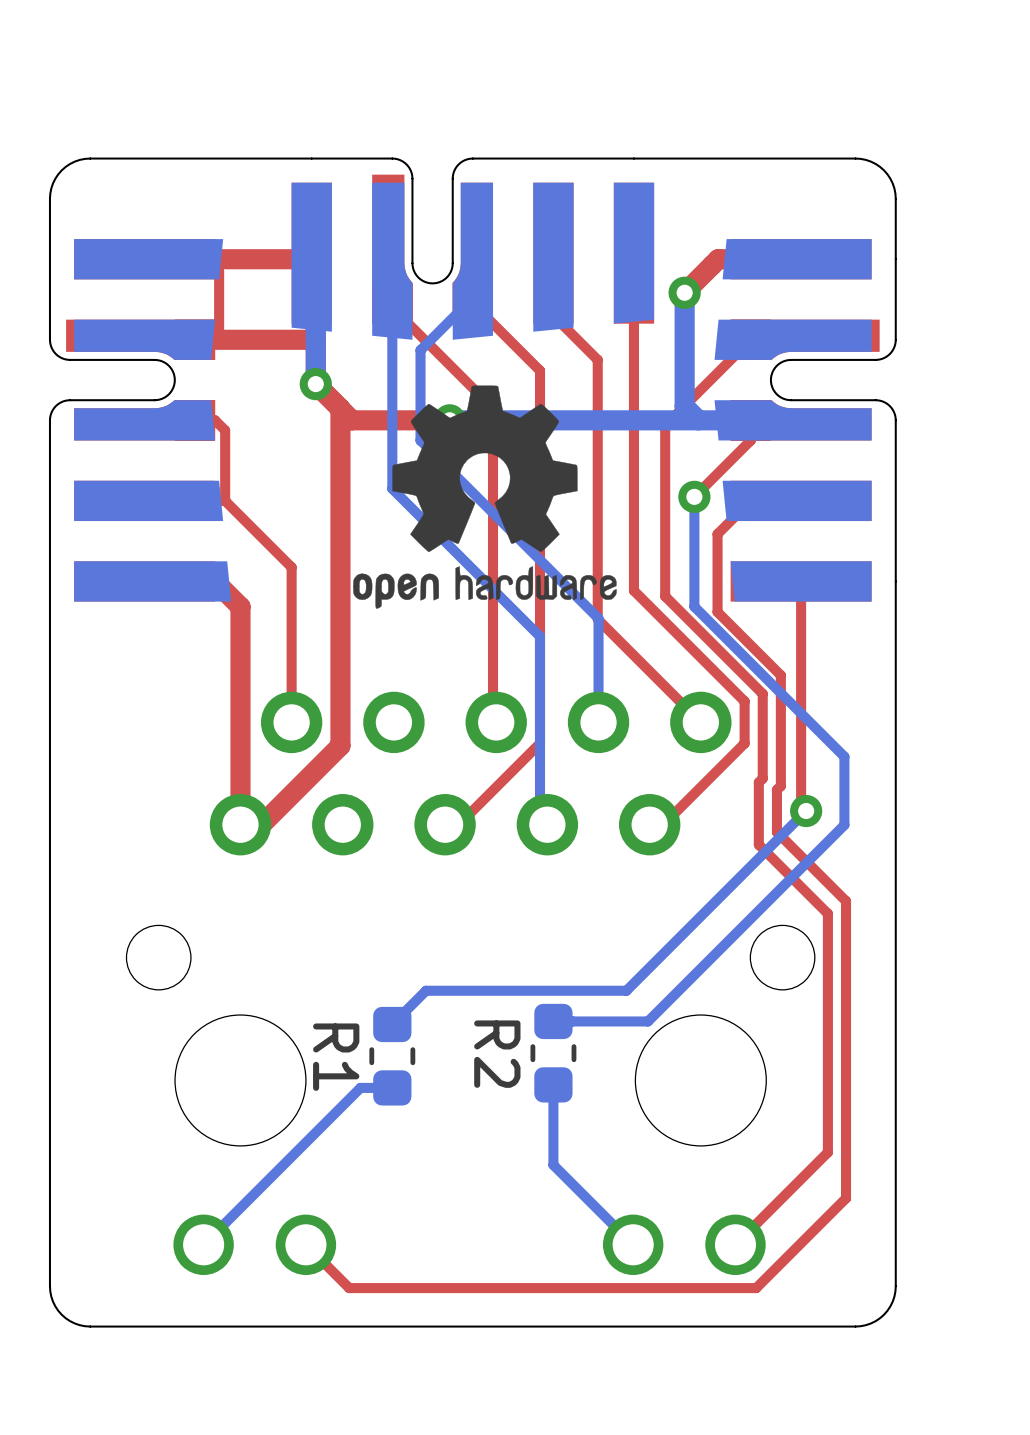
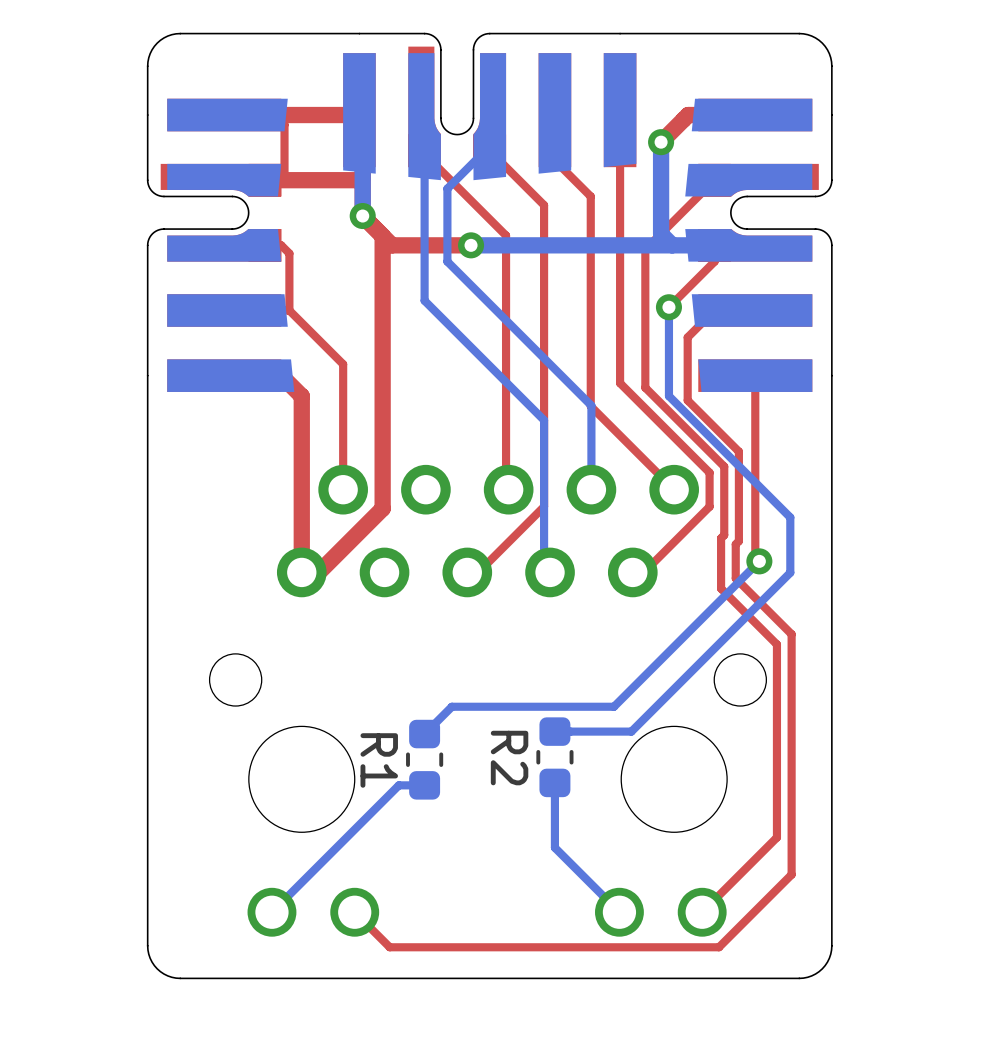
drawing: [353, 385, 617, 609] -> none

